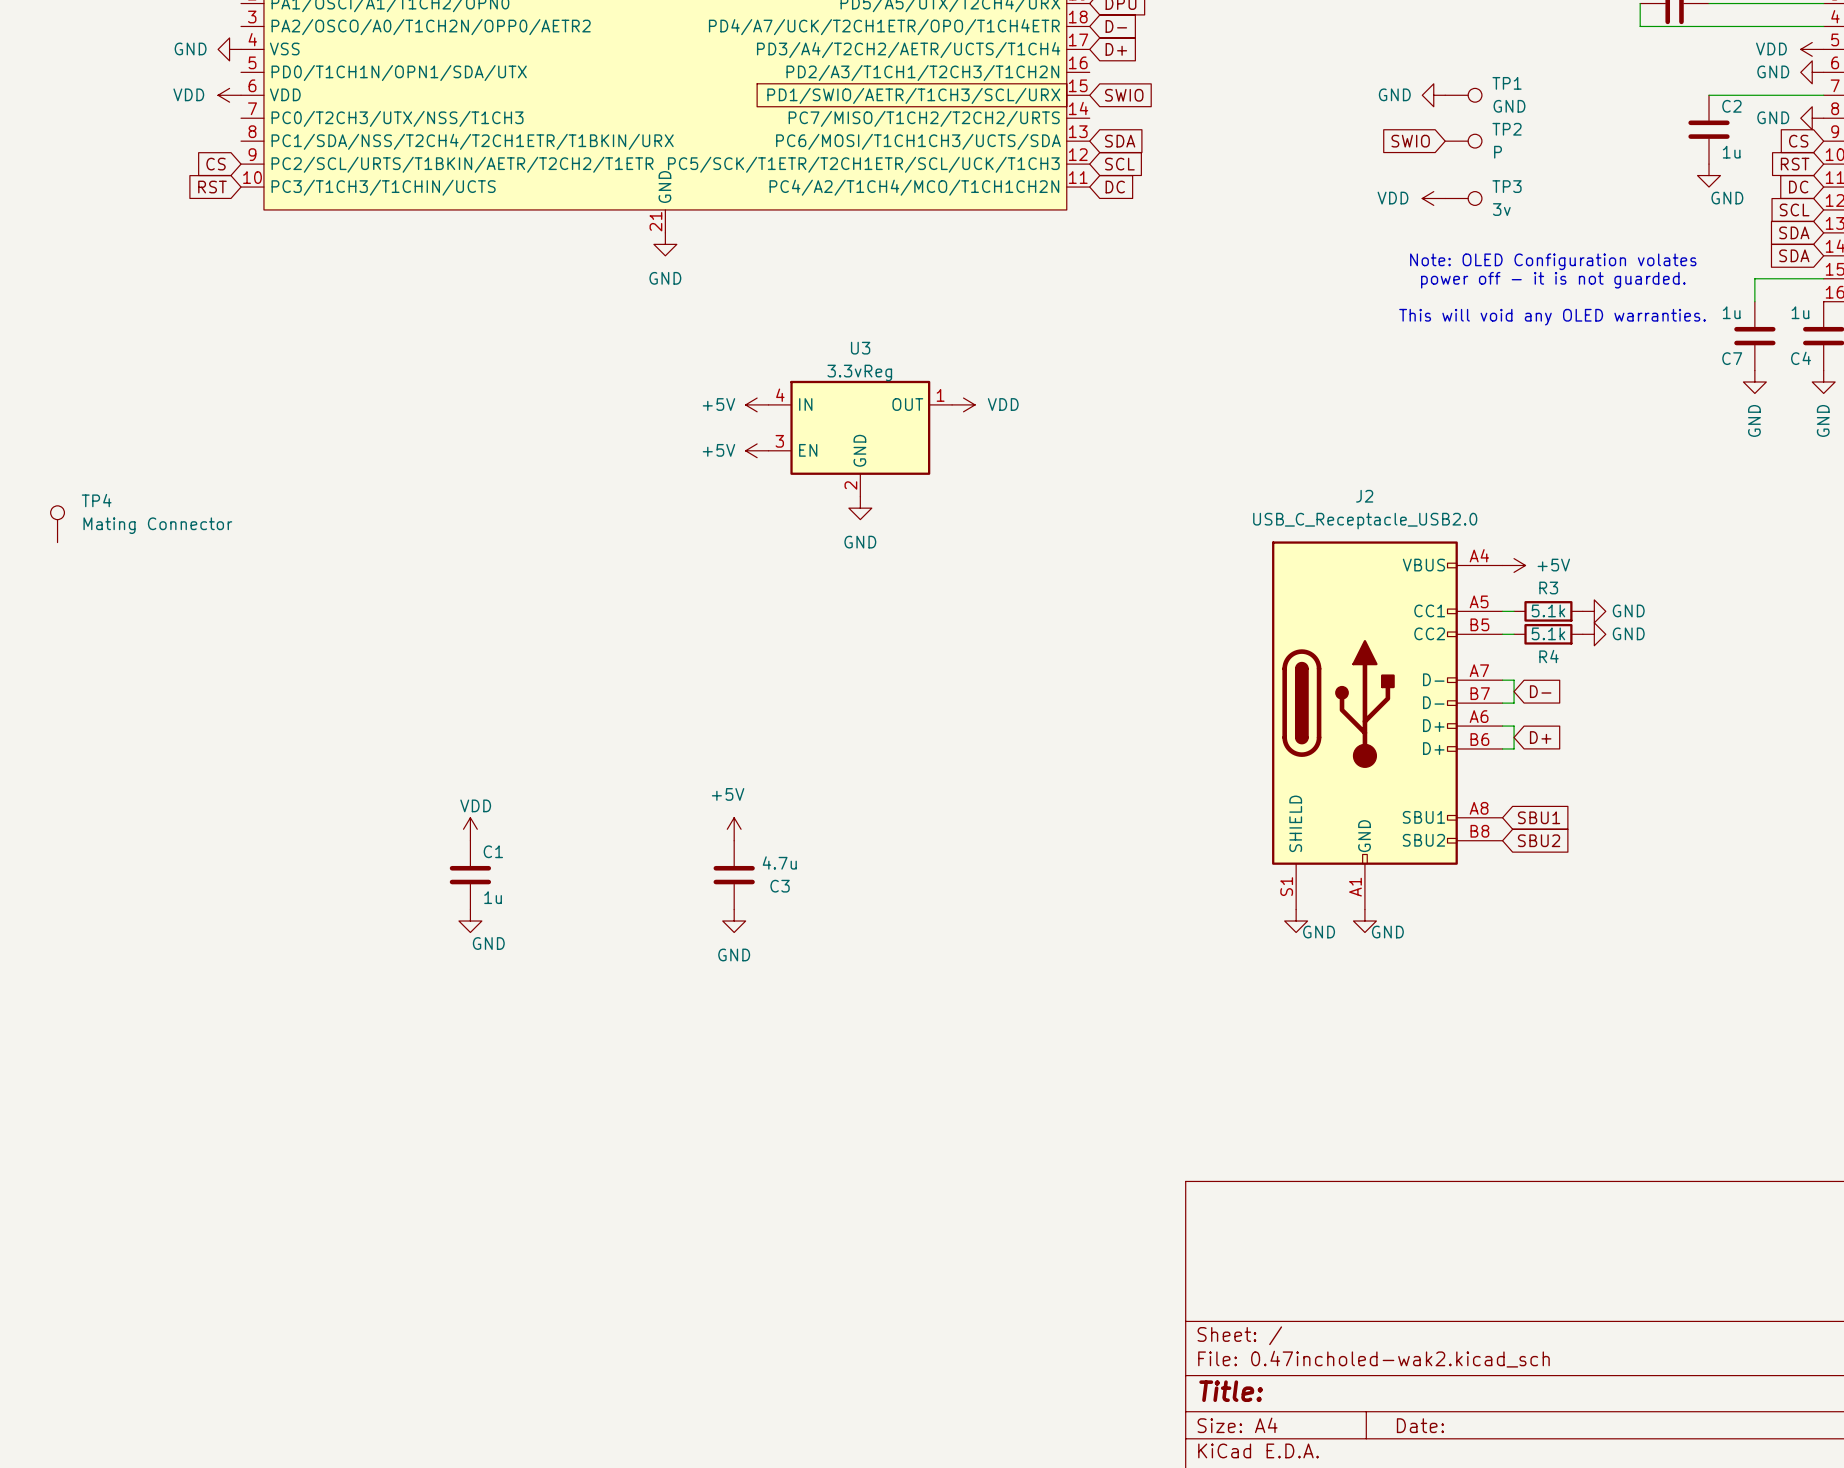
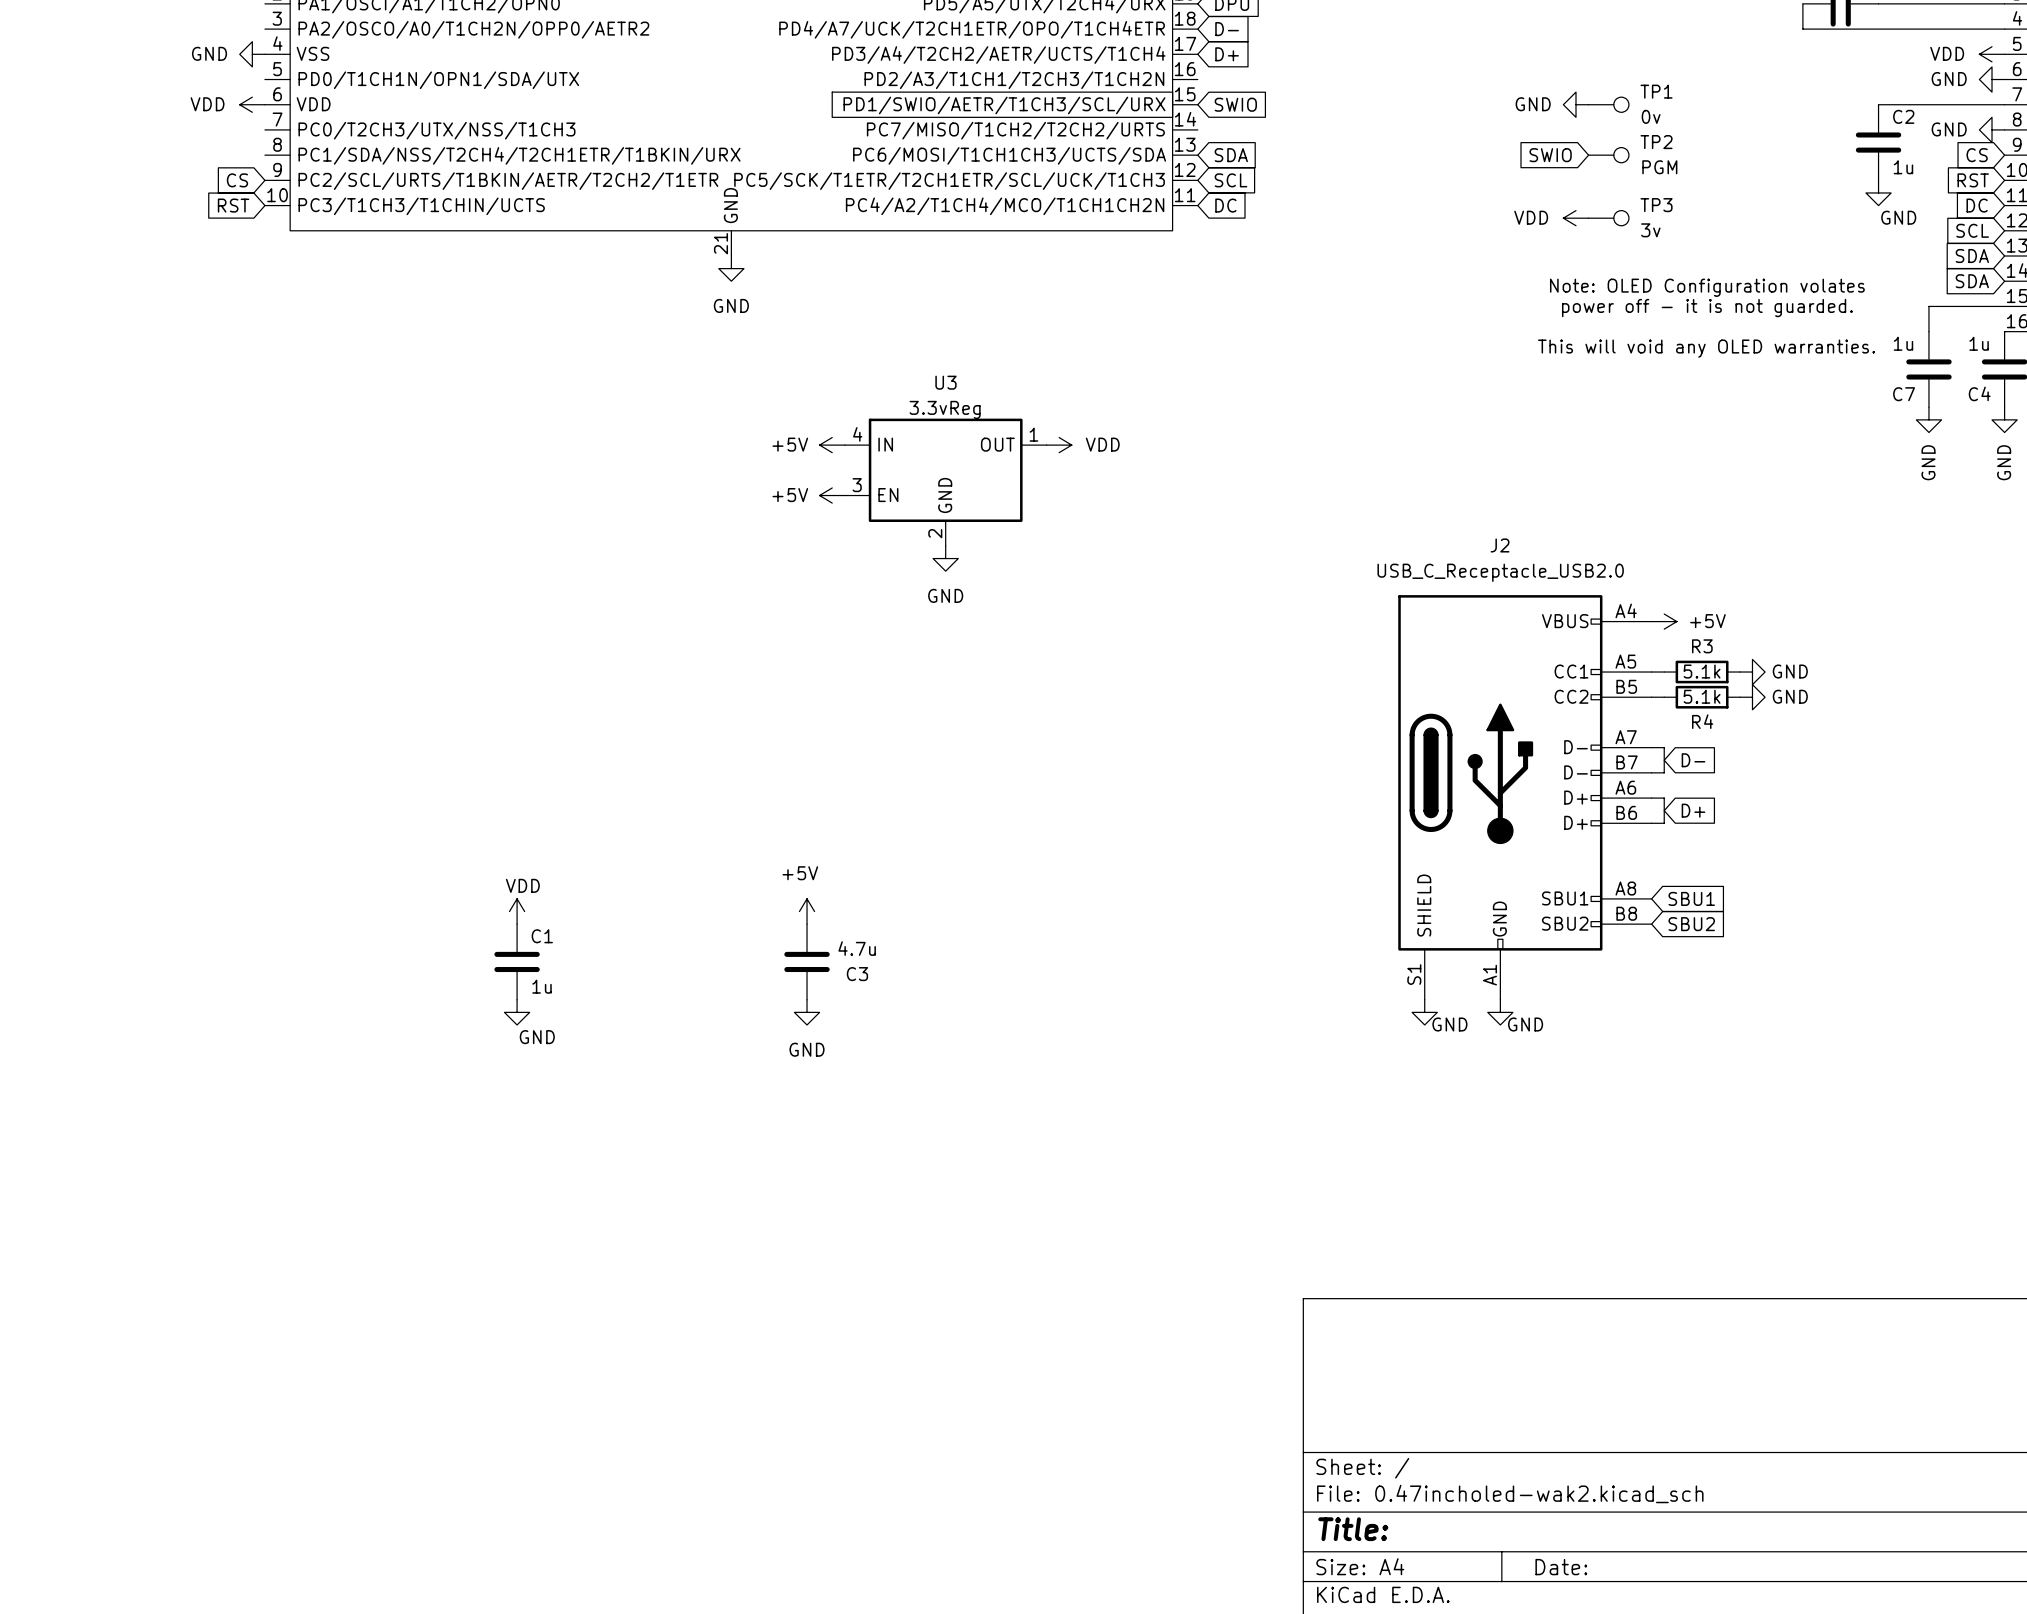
TP1 value: GND (1509, 106) -> 0v (1651, 116)
TP2 value: P (1498, 152) -> PGM (1659, 167)
TP4: Mating Connector (57, 524) -> none

